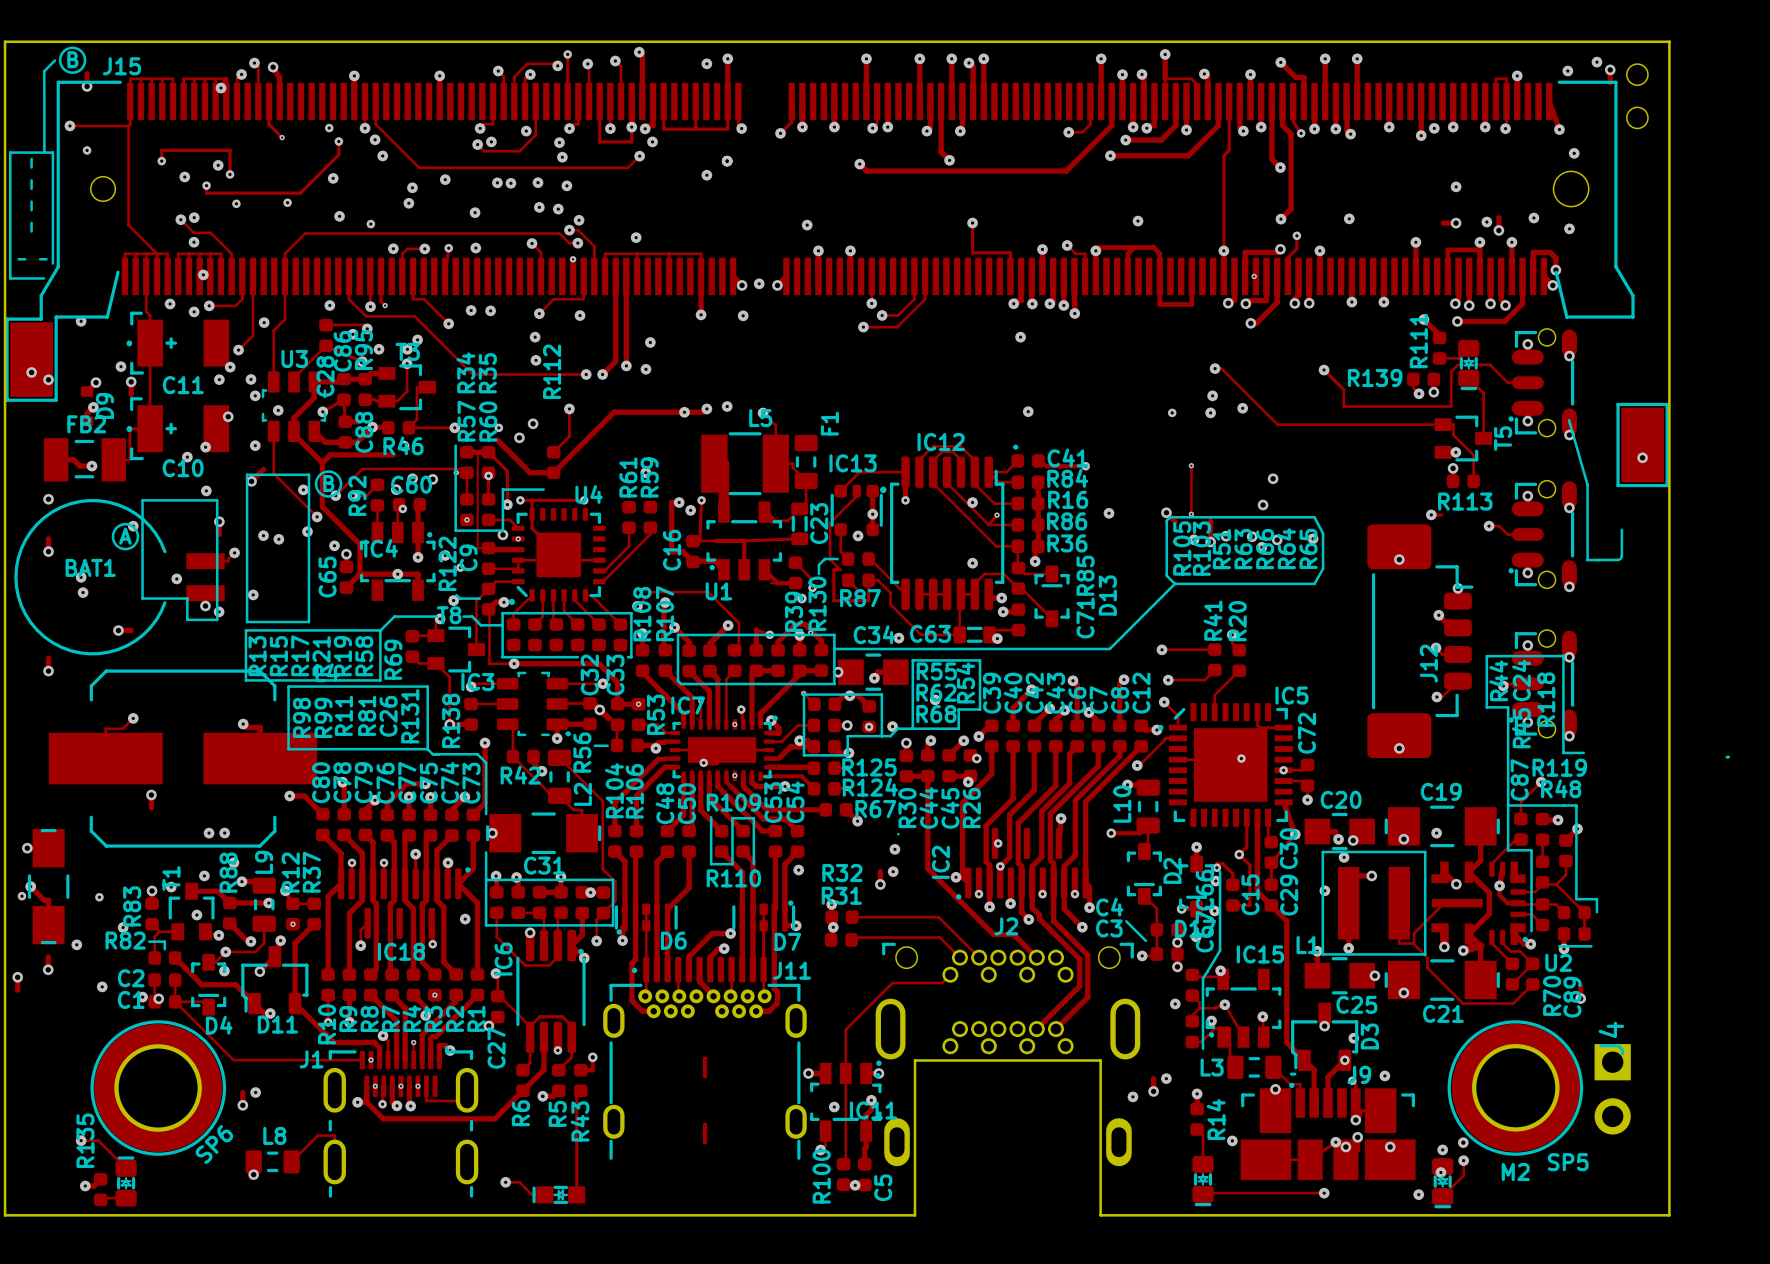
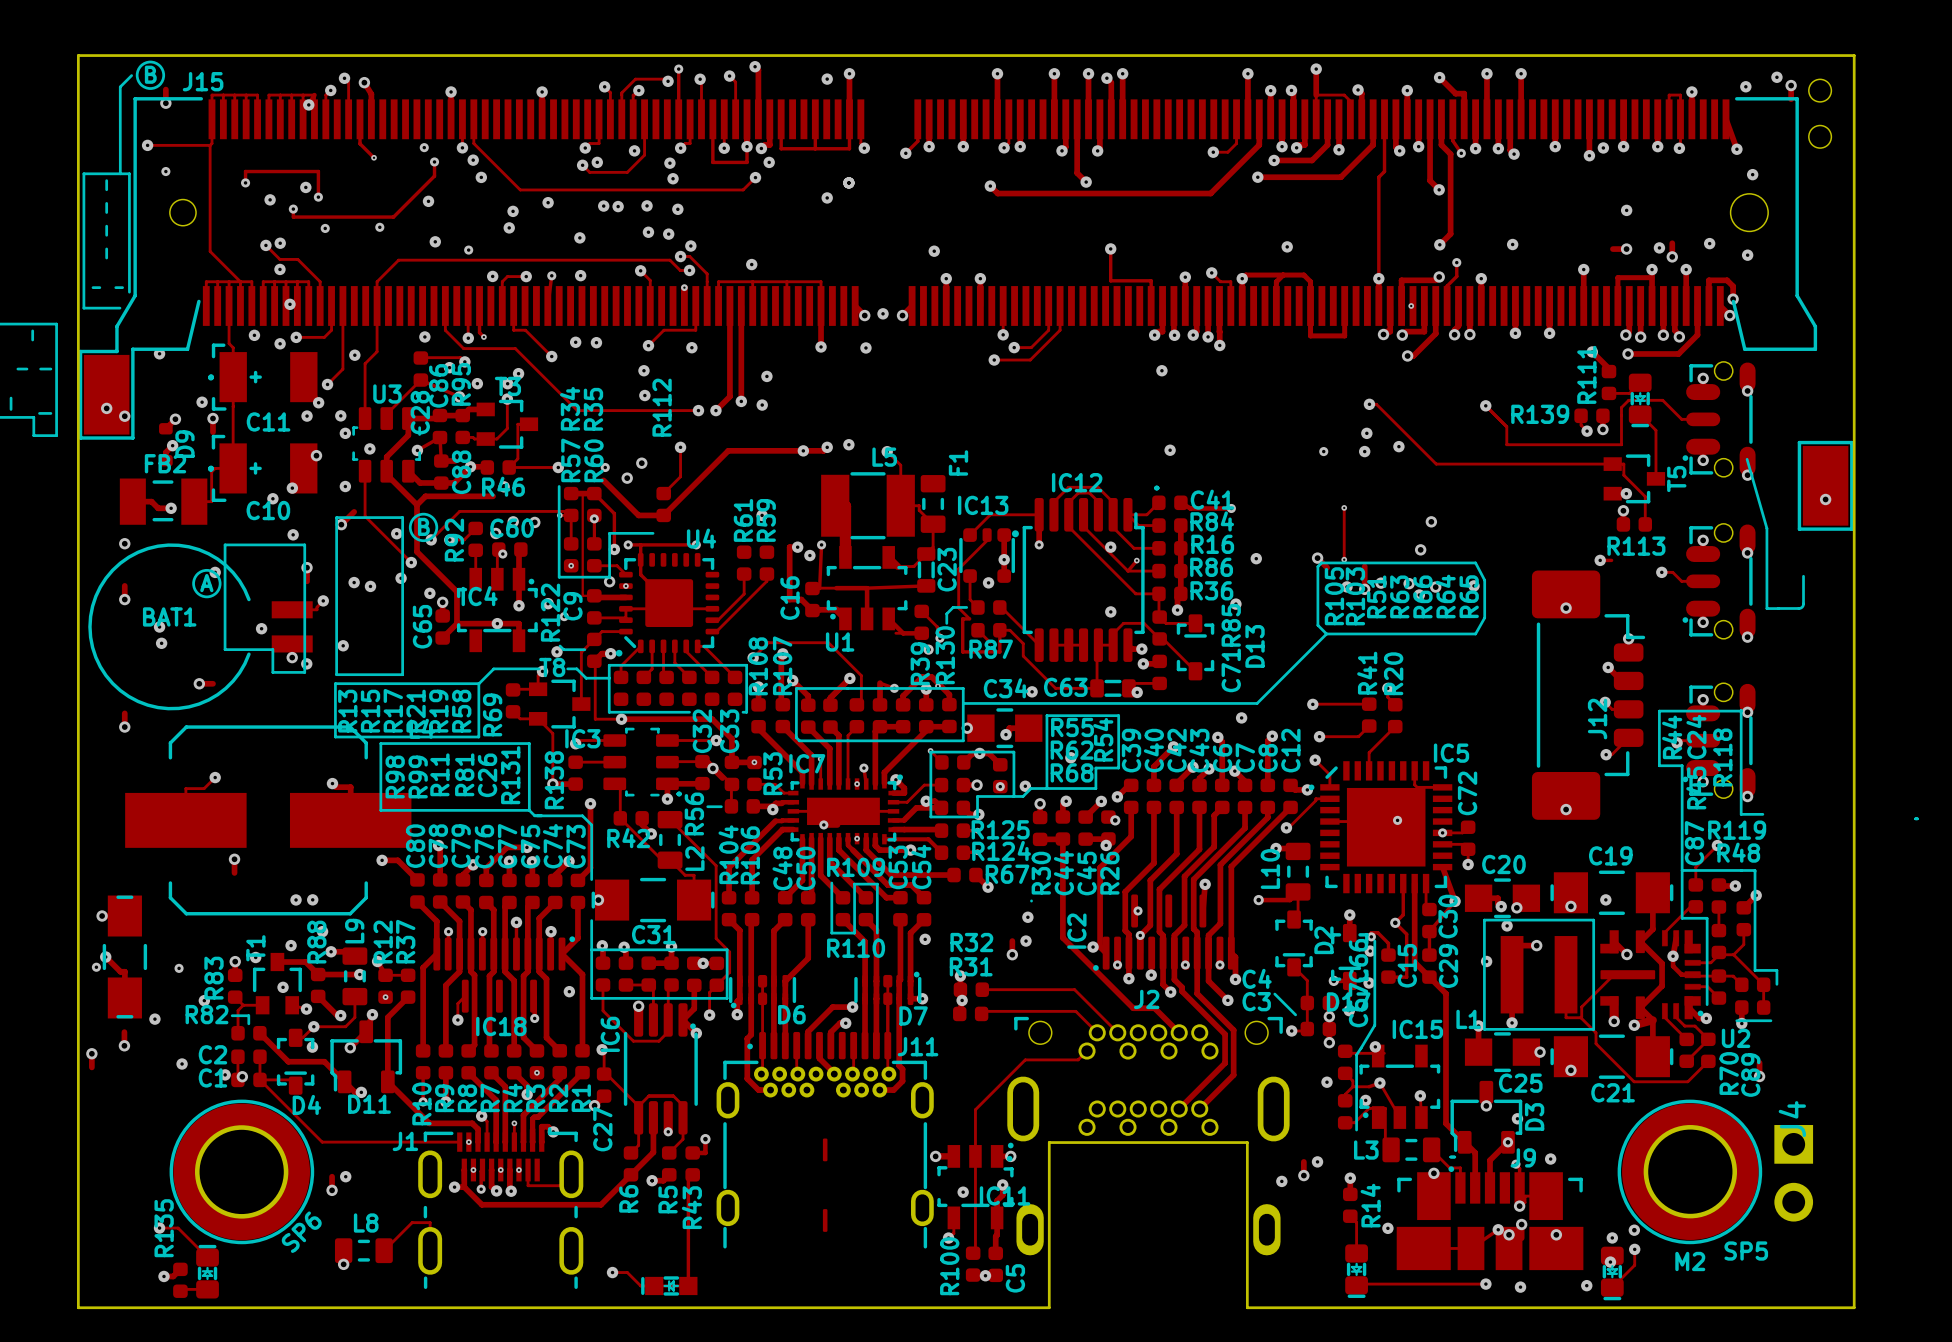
via: none -> (1235, 604)
via: none -> (1241, 717)
via: none -> (1520, 1287)

